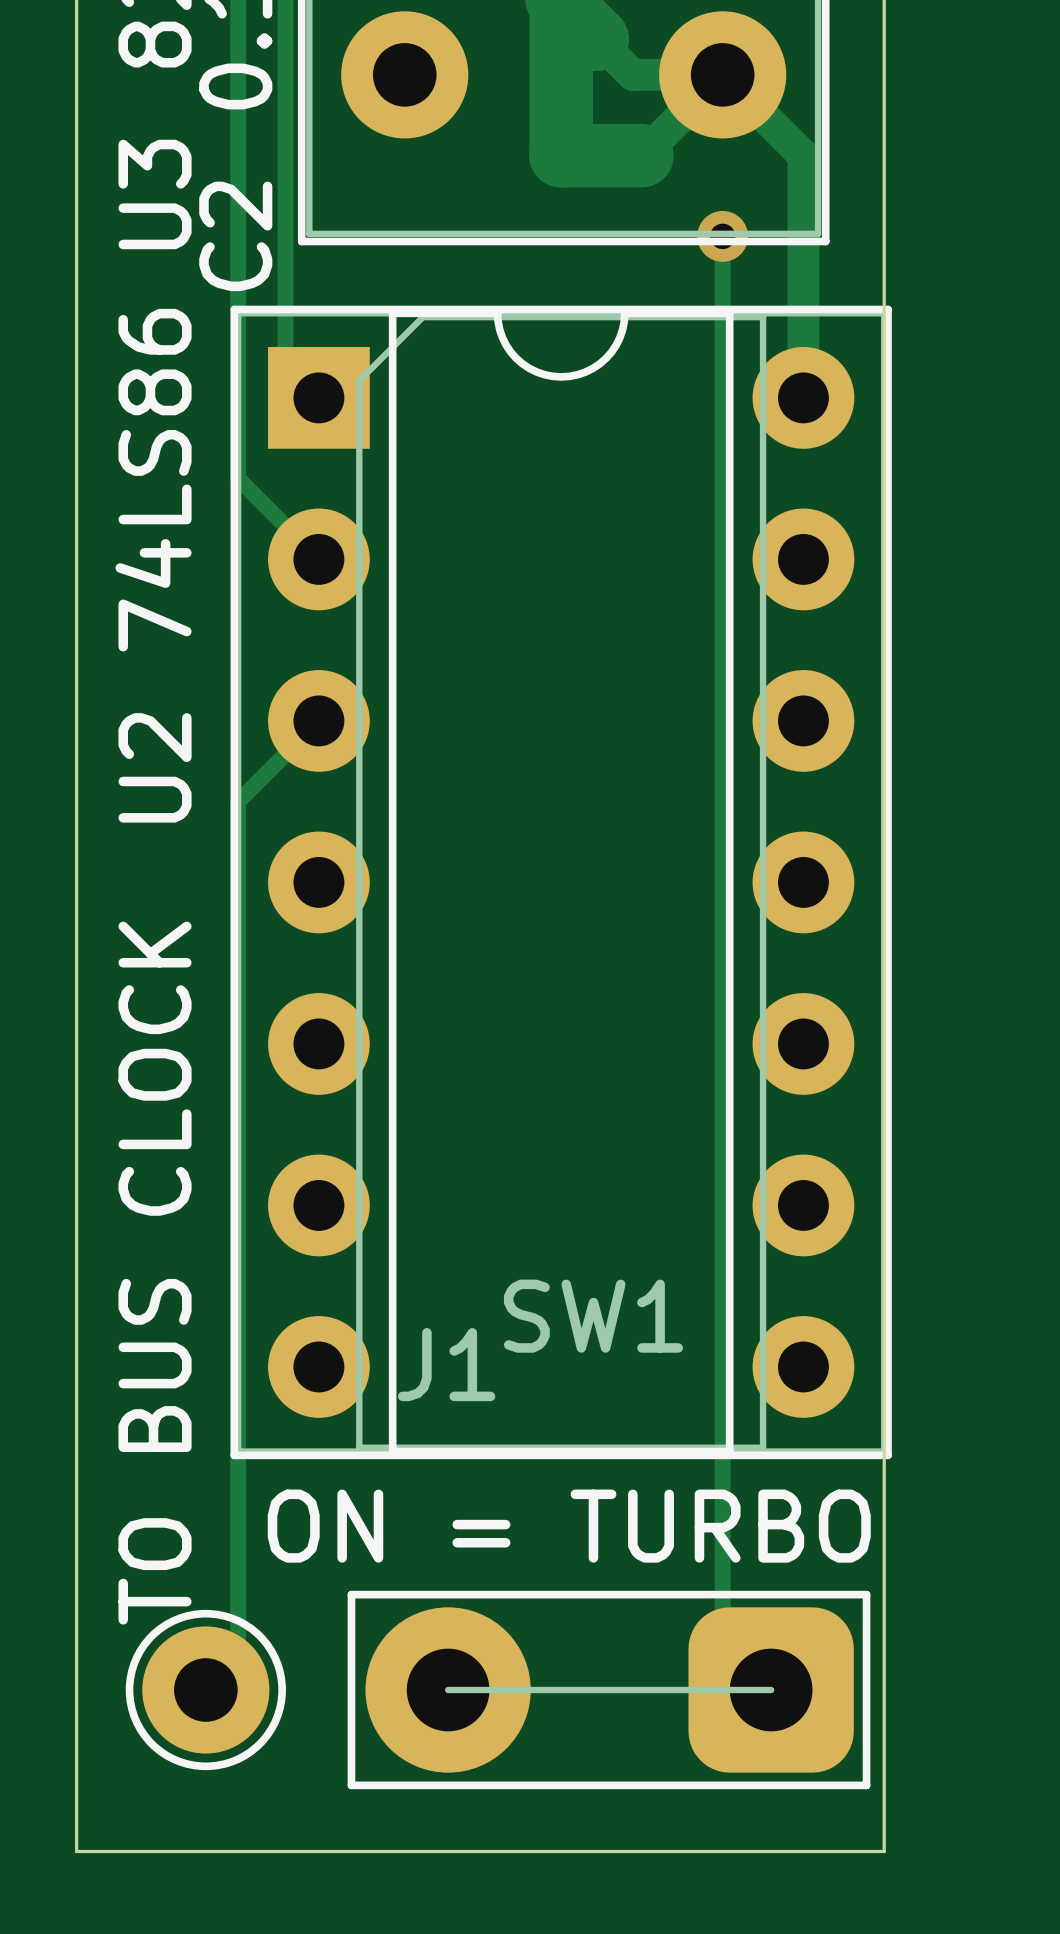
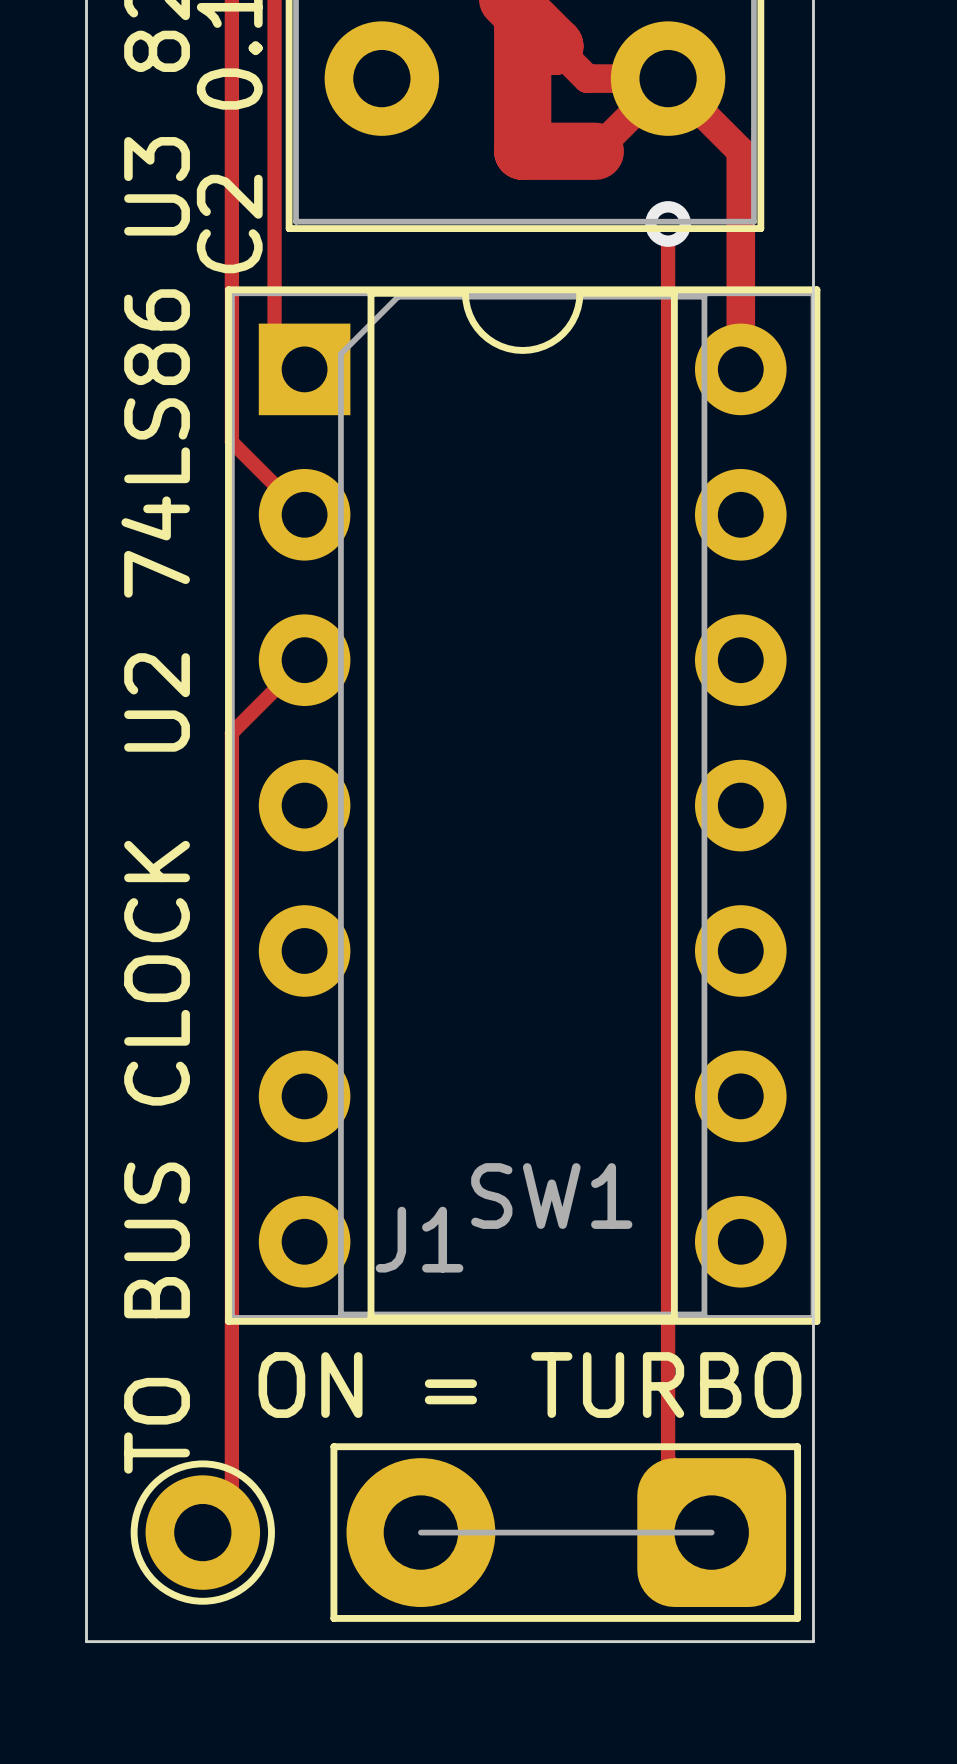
board edge: (76, 1811) (76, 1851) (884, 1851) (884, 1811) -> (86, 1641) (813, 1641)

